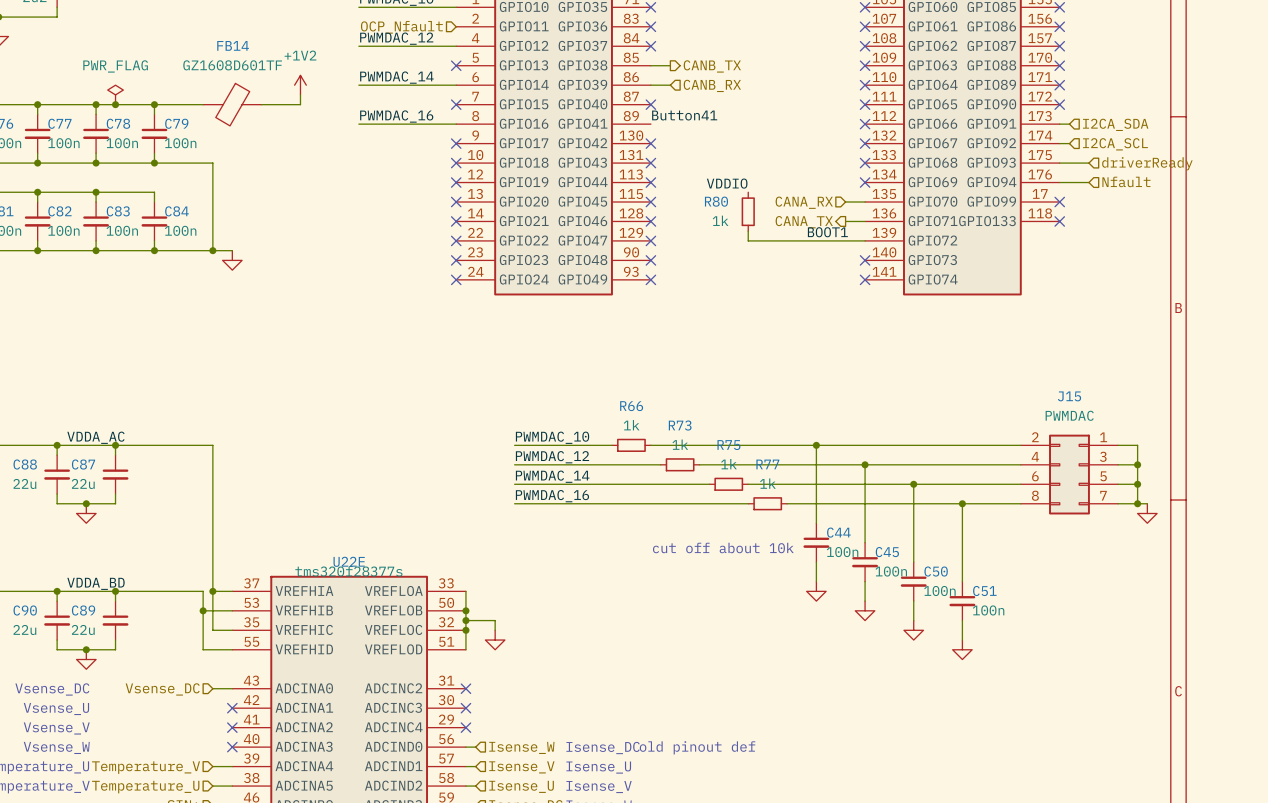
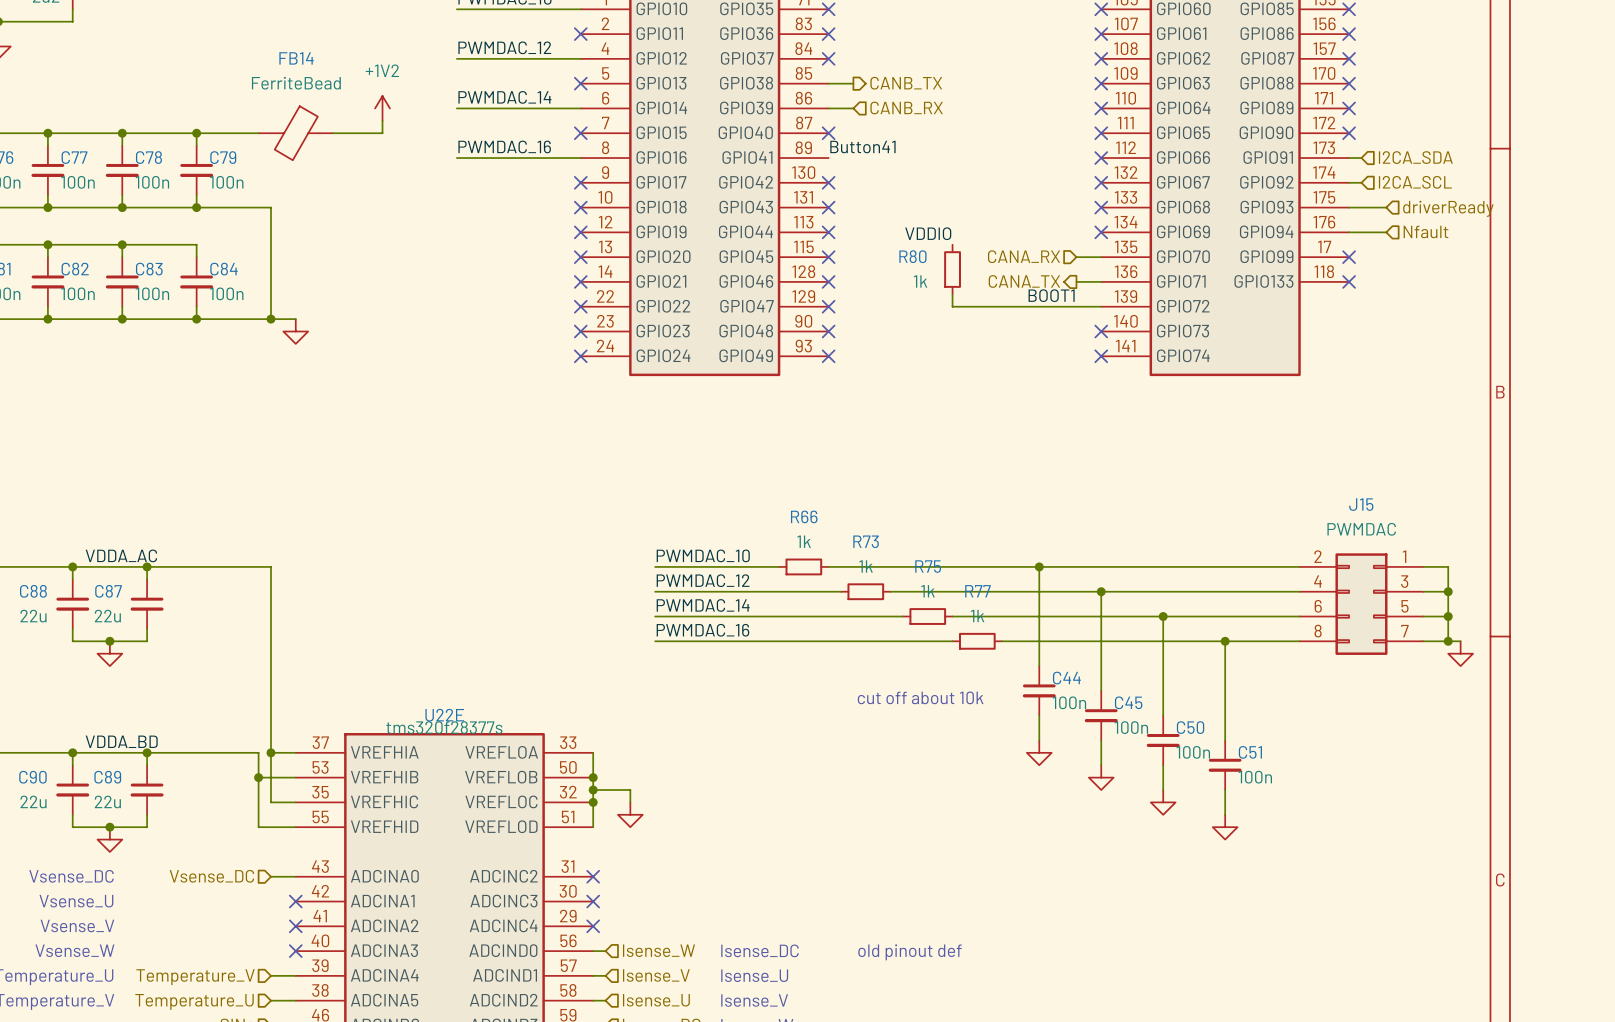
no-connect mark: none -> (580, 34)
hierarchical label: OCP_Nfault (401, 27) -> none
FB14 value: GZ1608D601TF (232, 65) -> FerriteBead (296, 83)
power symbol: PWR_FLAG (115, 94) -> none
junction: (115, 104) -> none

